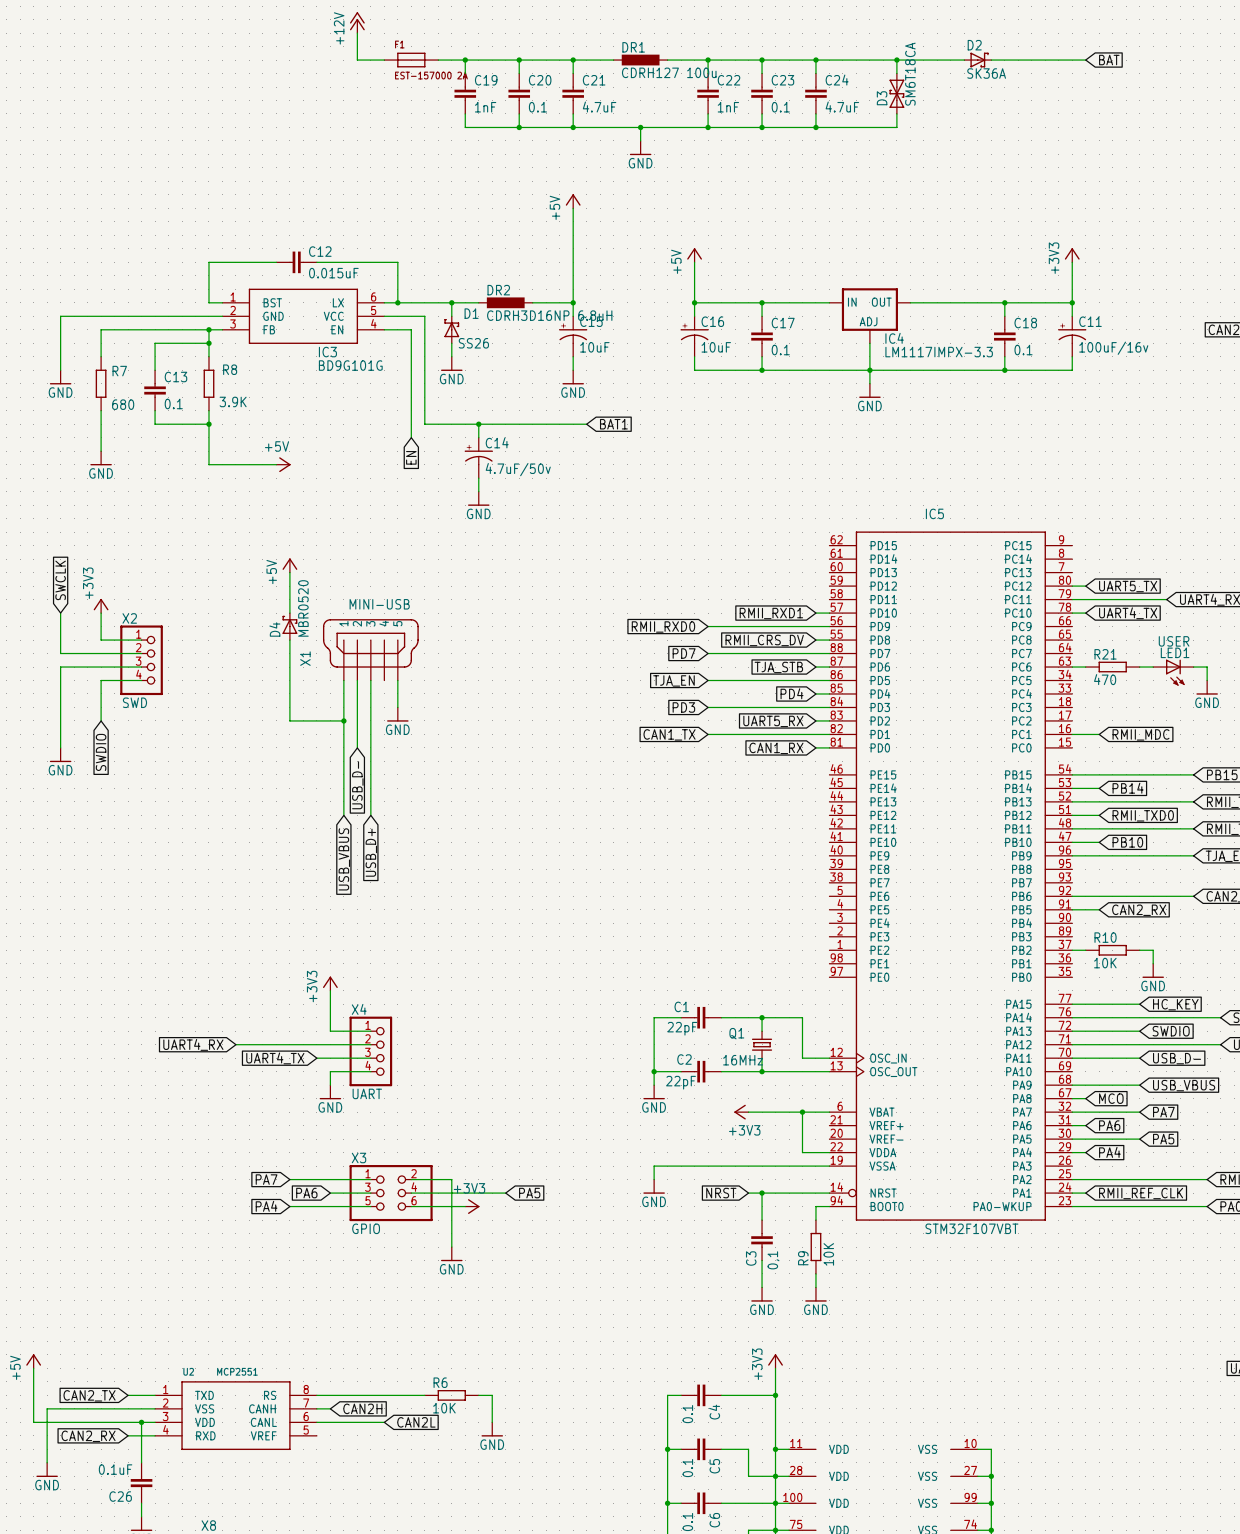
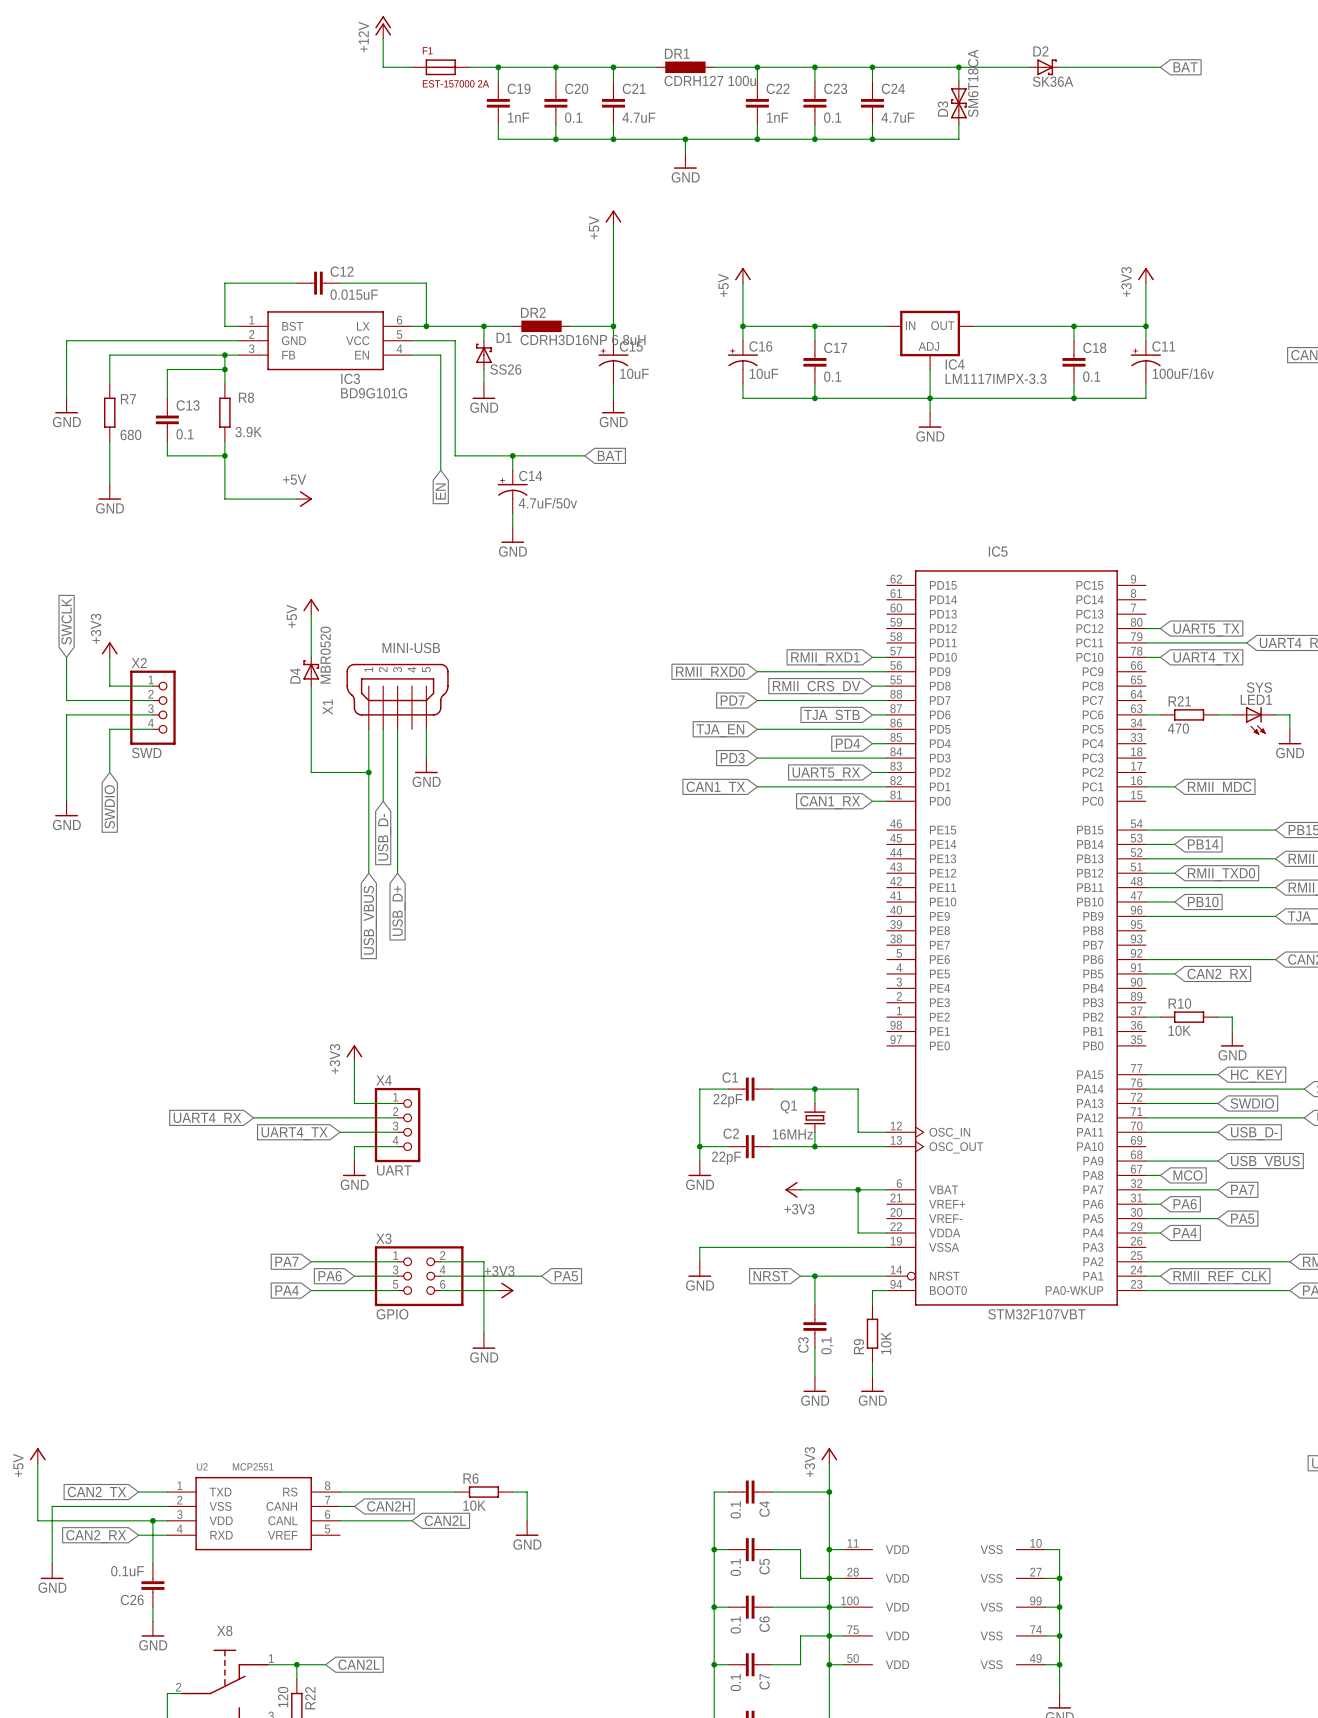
wire: (546, 424) (586, 424) -> none
global label: BAT1 (613, 424) -> BAT (609, 455)
LED1 value: USER (1174, 641) -> SYS (1259, 687)

